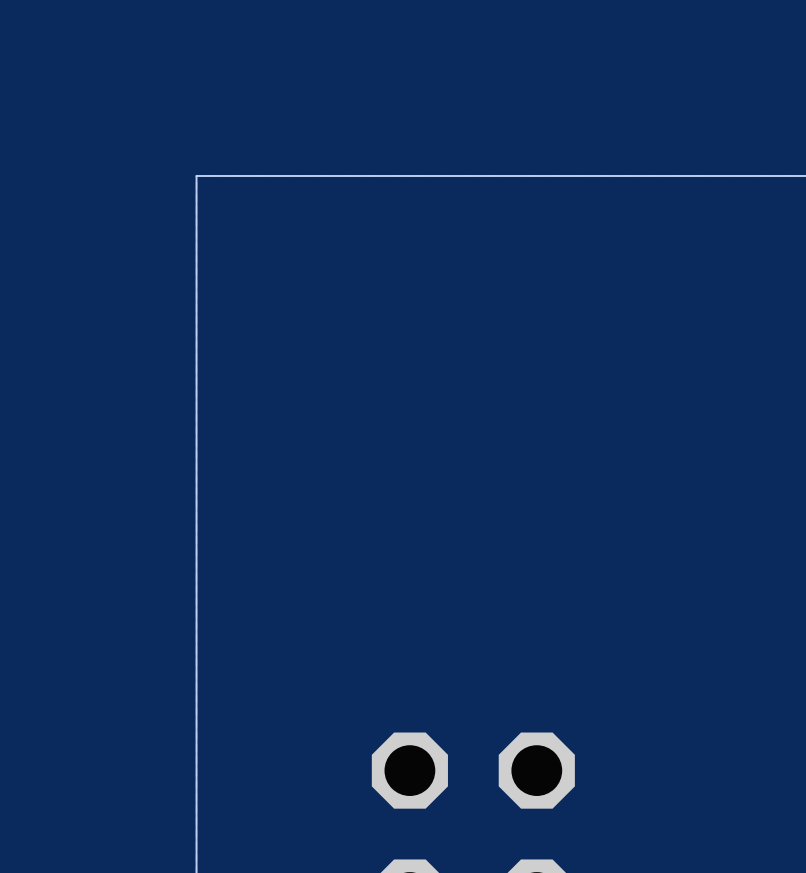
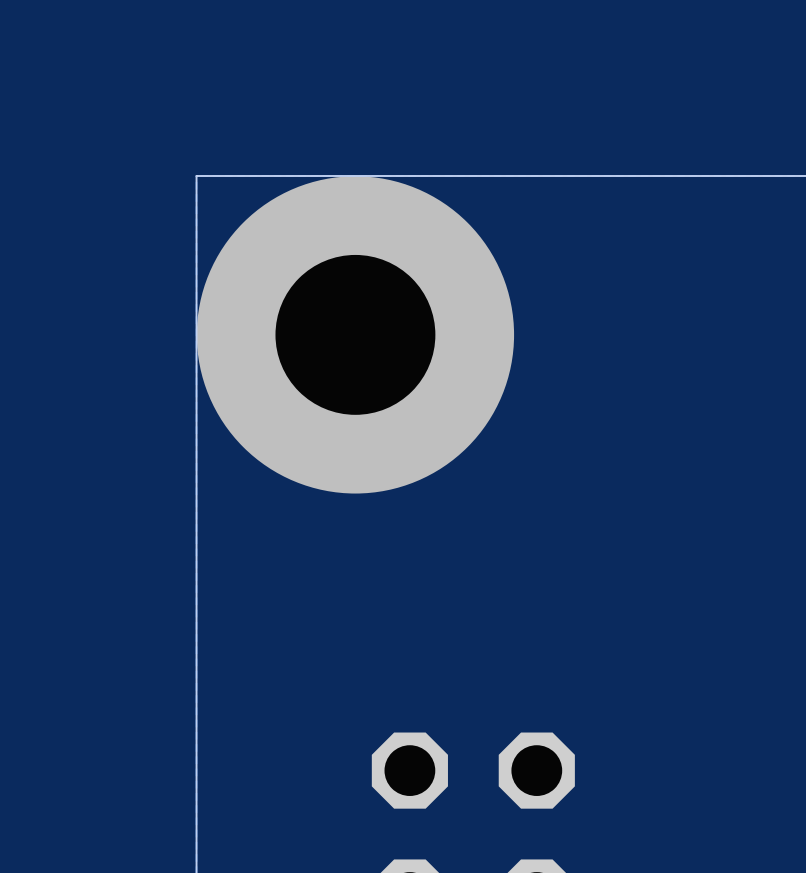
via: none -> (355, 334)

